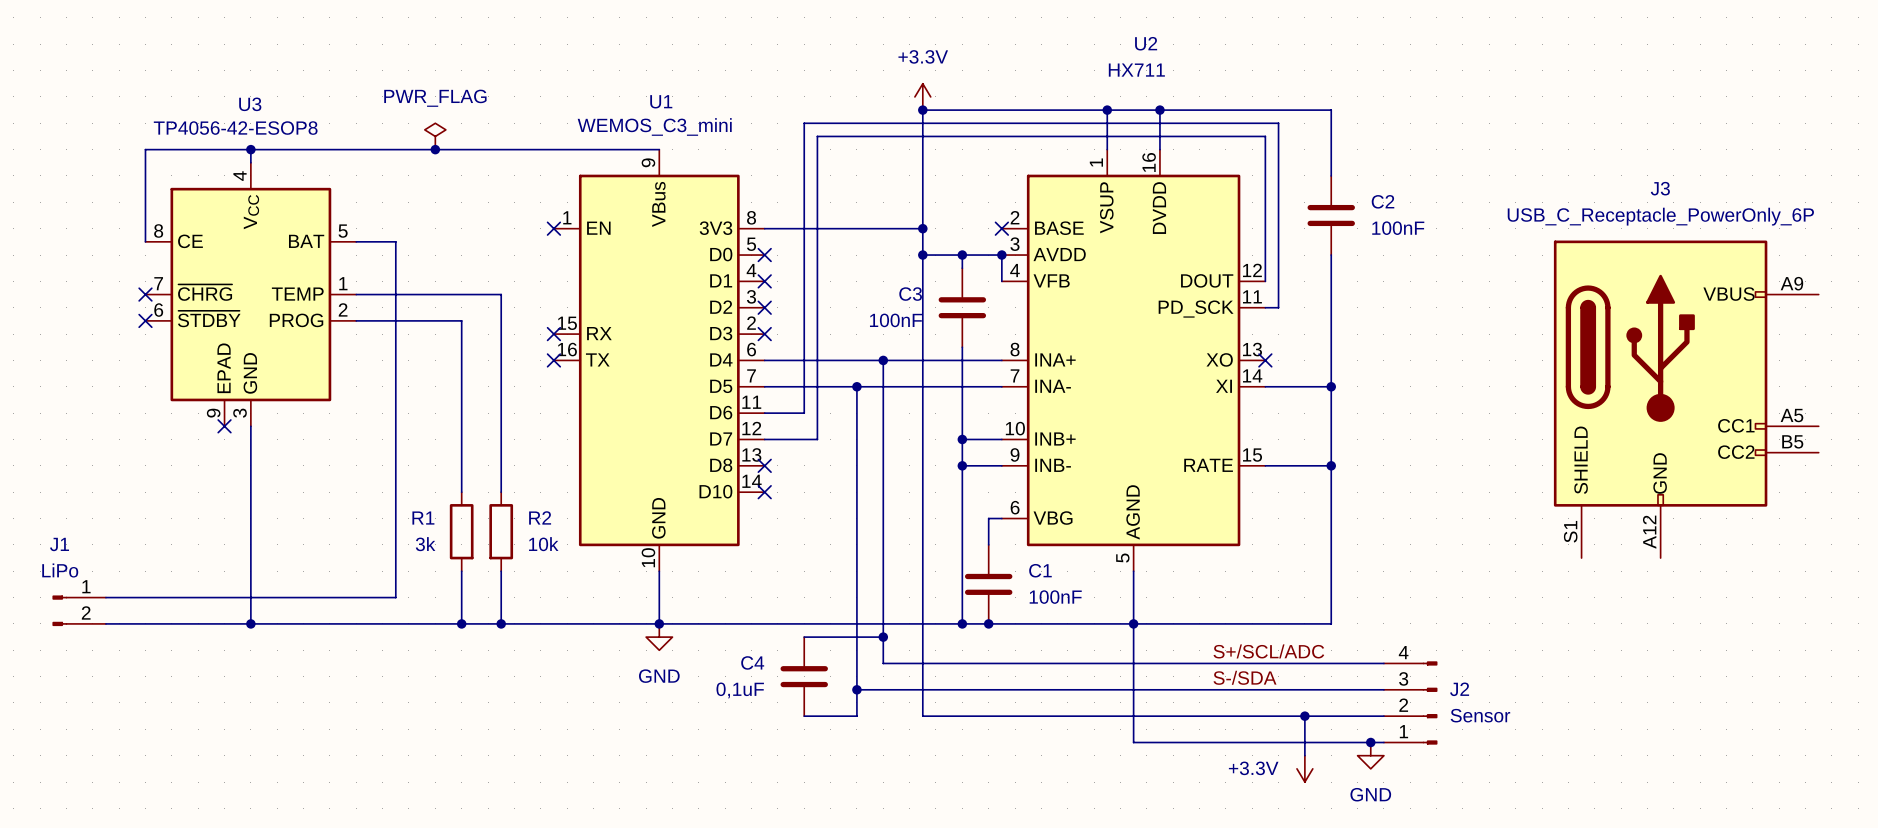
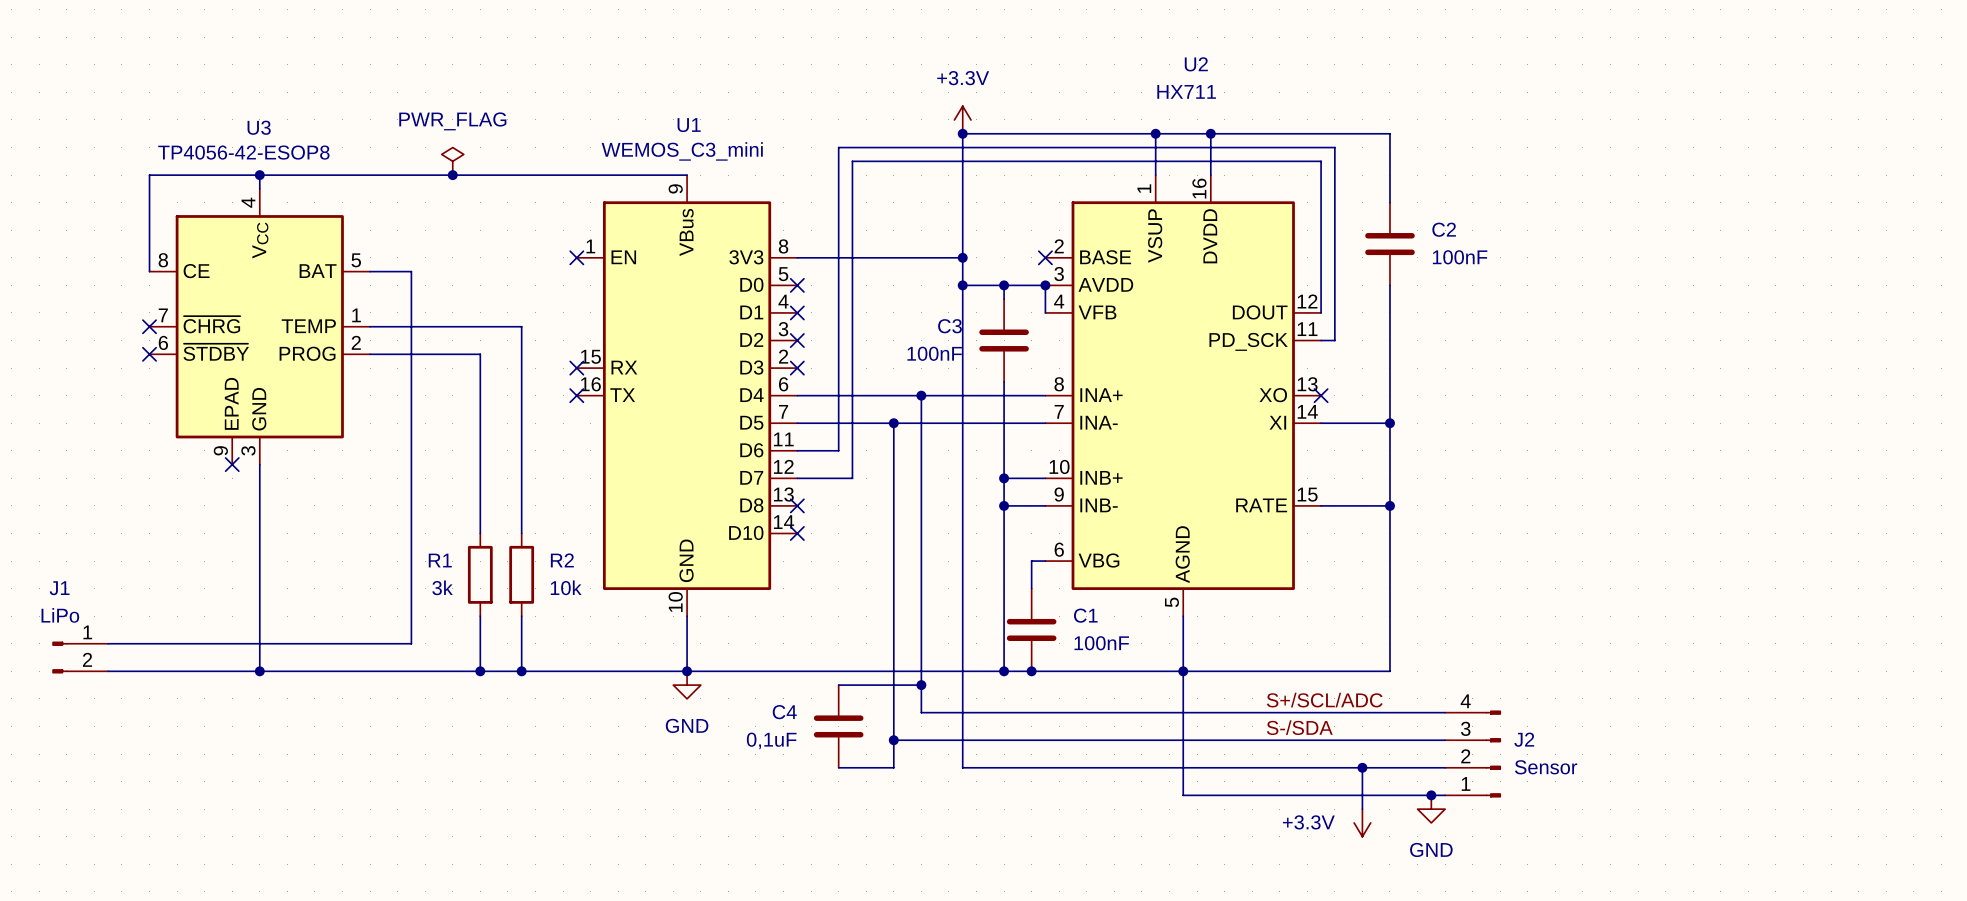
J3: USB_C_Receptacle_PowerOnly_6P (1686, 399) -> none

